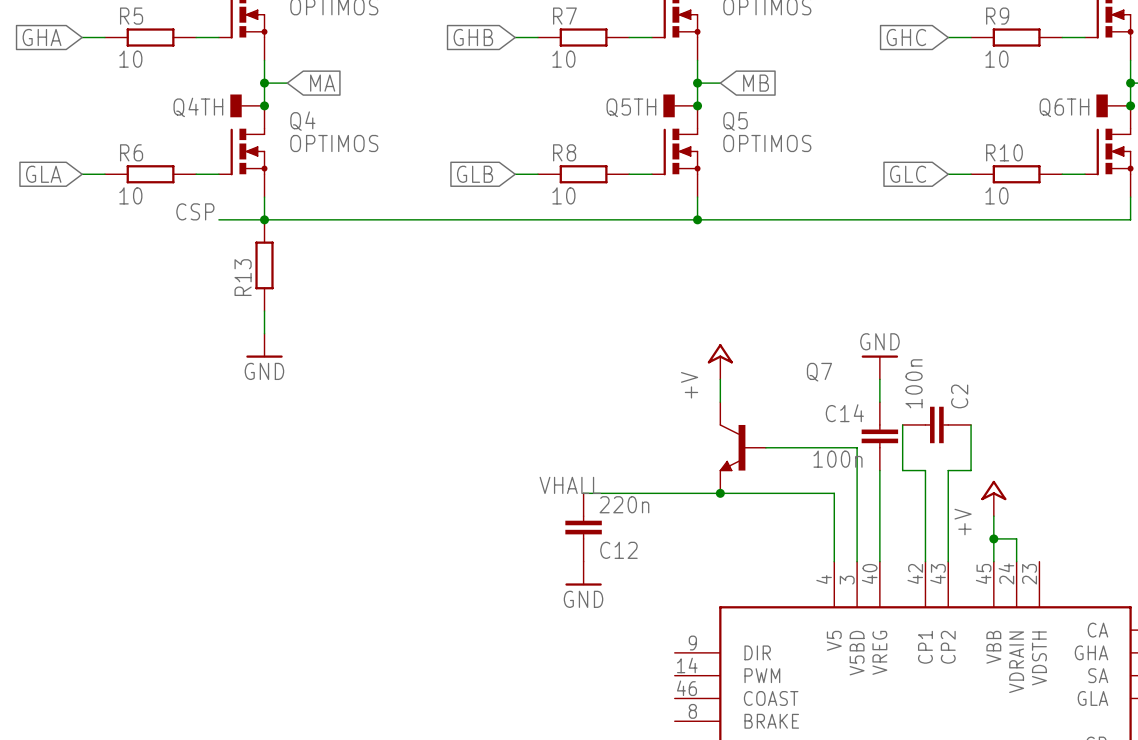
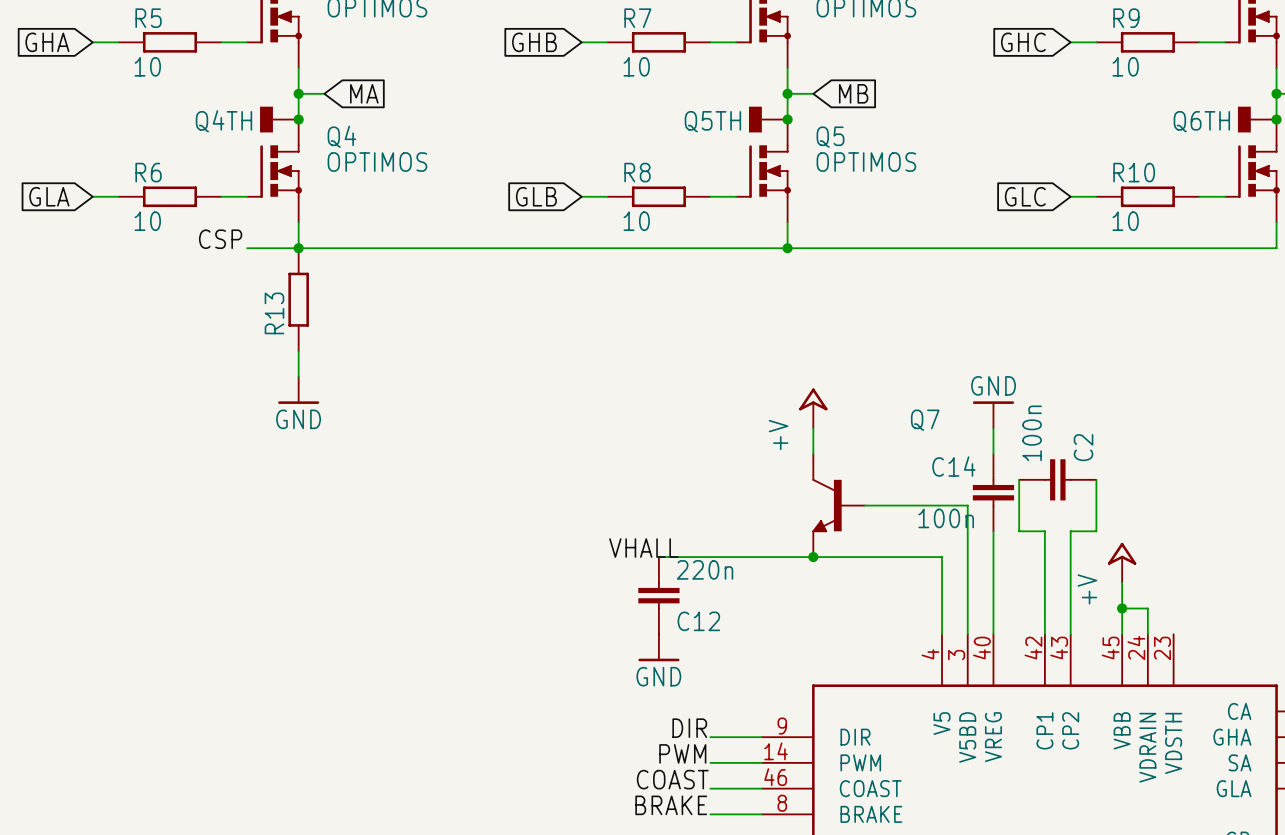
label: none -> DIR (689, 728)
wire: none -> (710, 737) (761, 737)
label: none -> PWM (682, 753)
wire: none -> (710, 762) (761, 762)
label: none -> COAST (672, 779)
wire: none -> (710, 788) (761, 788)
label: none -> BRAKE (671, 805)
wire: none -> (710, 814) (761, 814)

